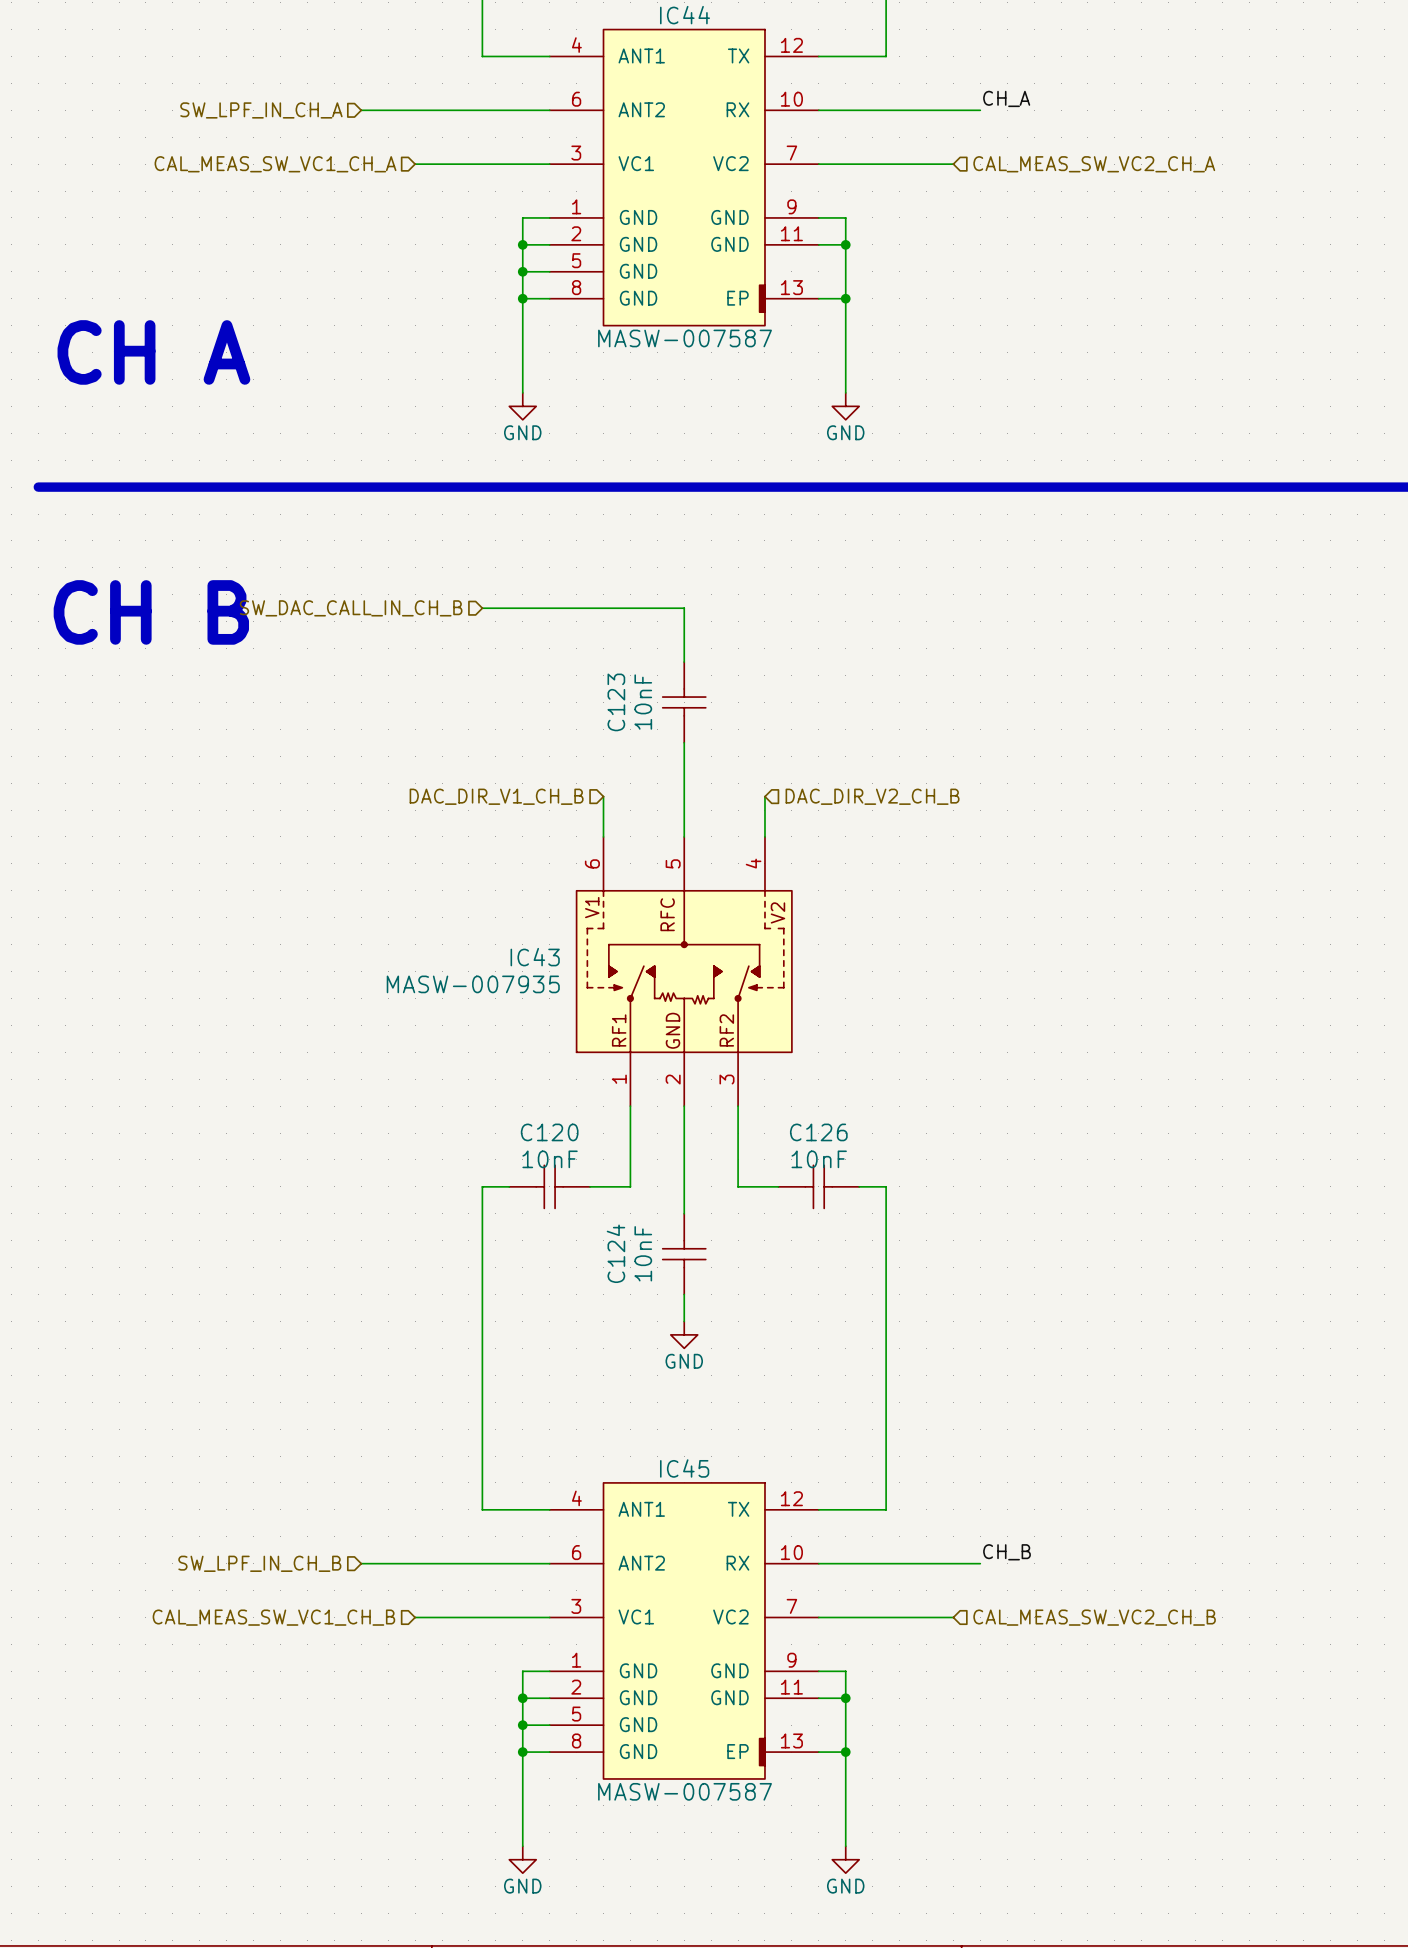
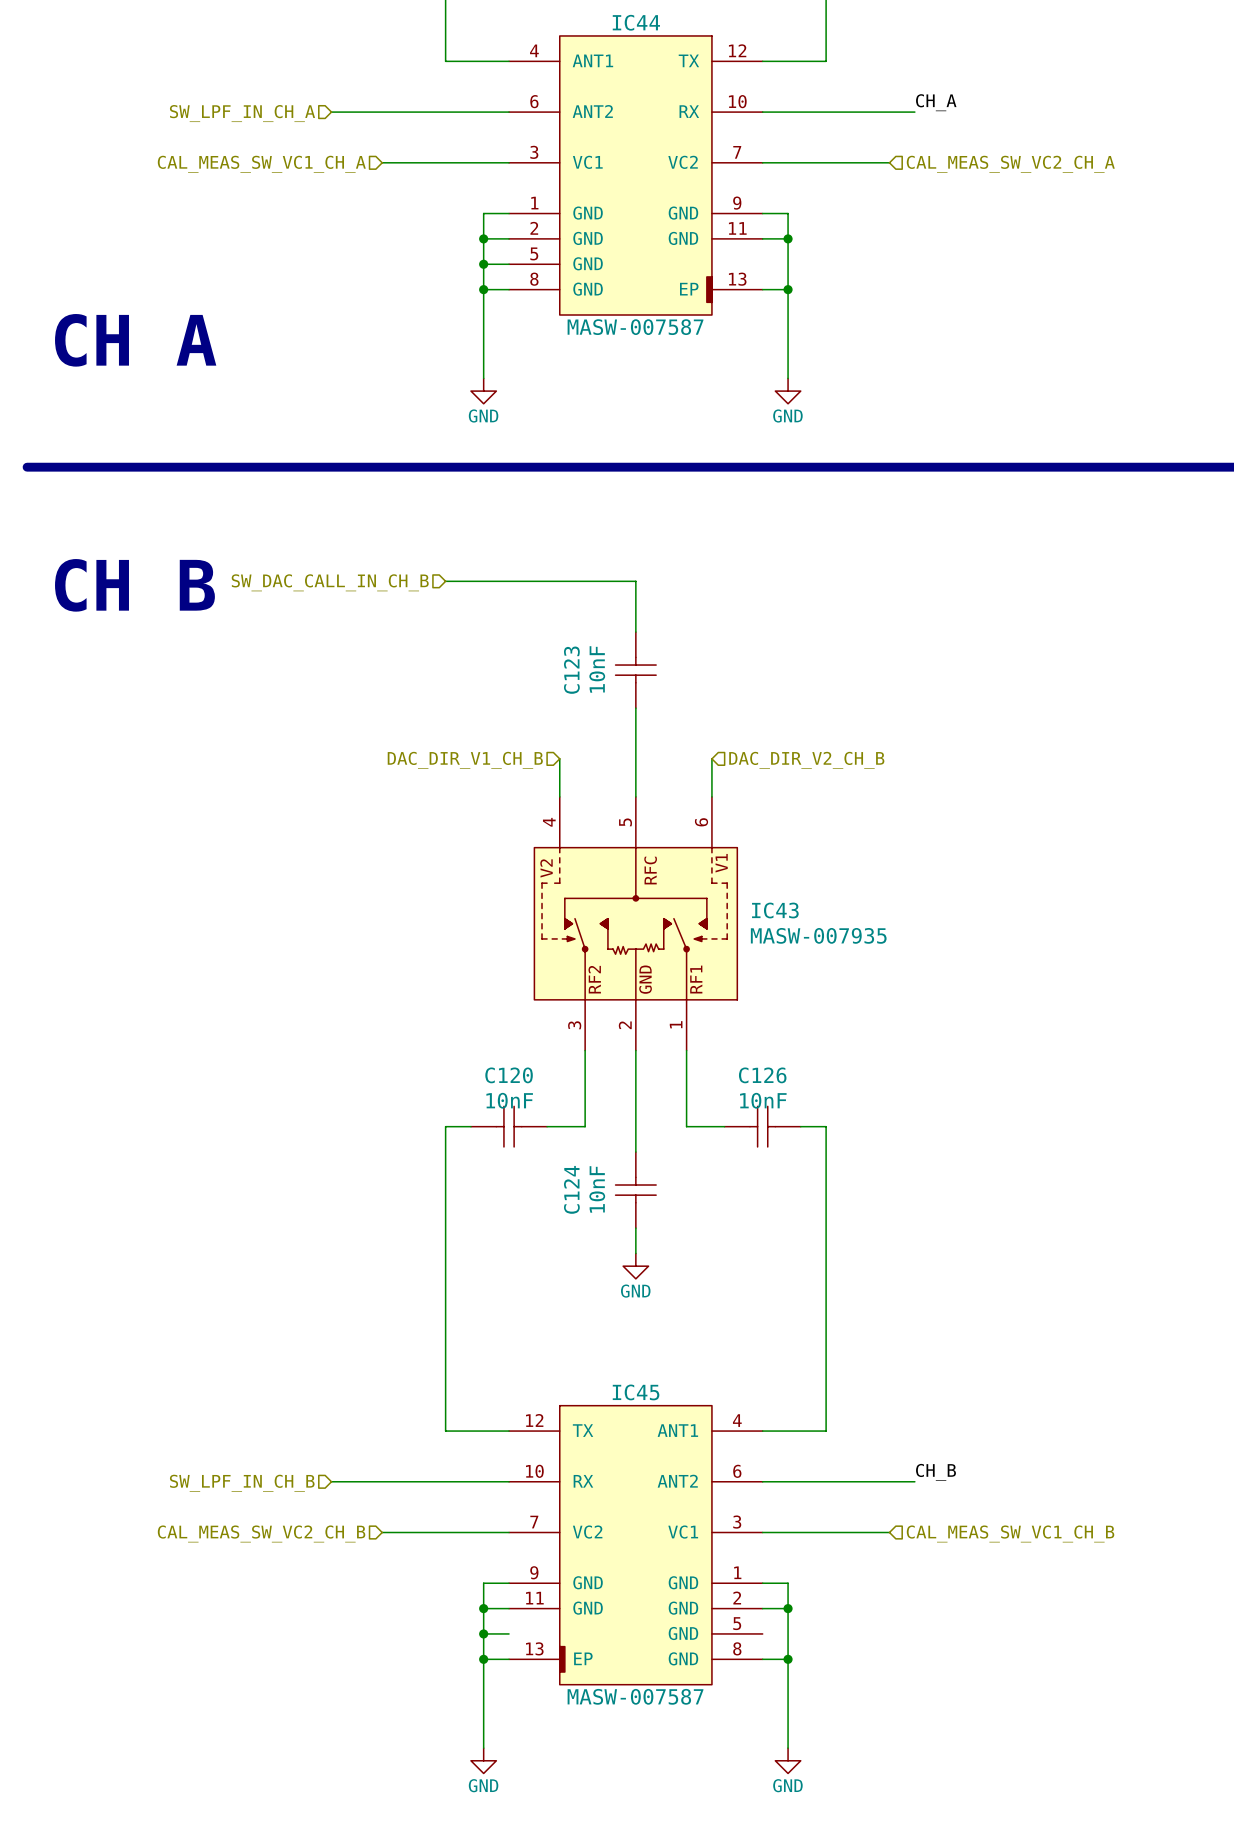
IC43 flip: as is (684, 971) -> left-right (635, 923)
hierarchical label: CAL_MEAS_SW_VC1_CH_B (273, 1617) -> CAL_MEAS_SW_VC2_CH_B (261, 1533)
hierarchical label: CAL_MEAS_SW_VC2_CH_B (1094, 1617) -> CAL_MEAS_SW_VC1_CH_B (1010, 1533)
IC45 flip: as is (684, 1630) -> left-right (635, 1545)

